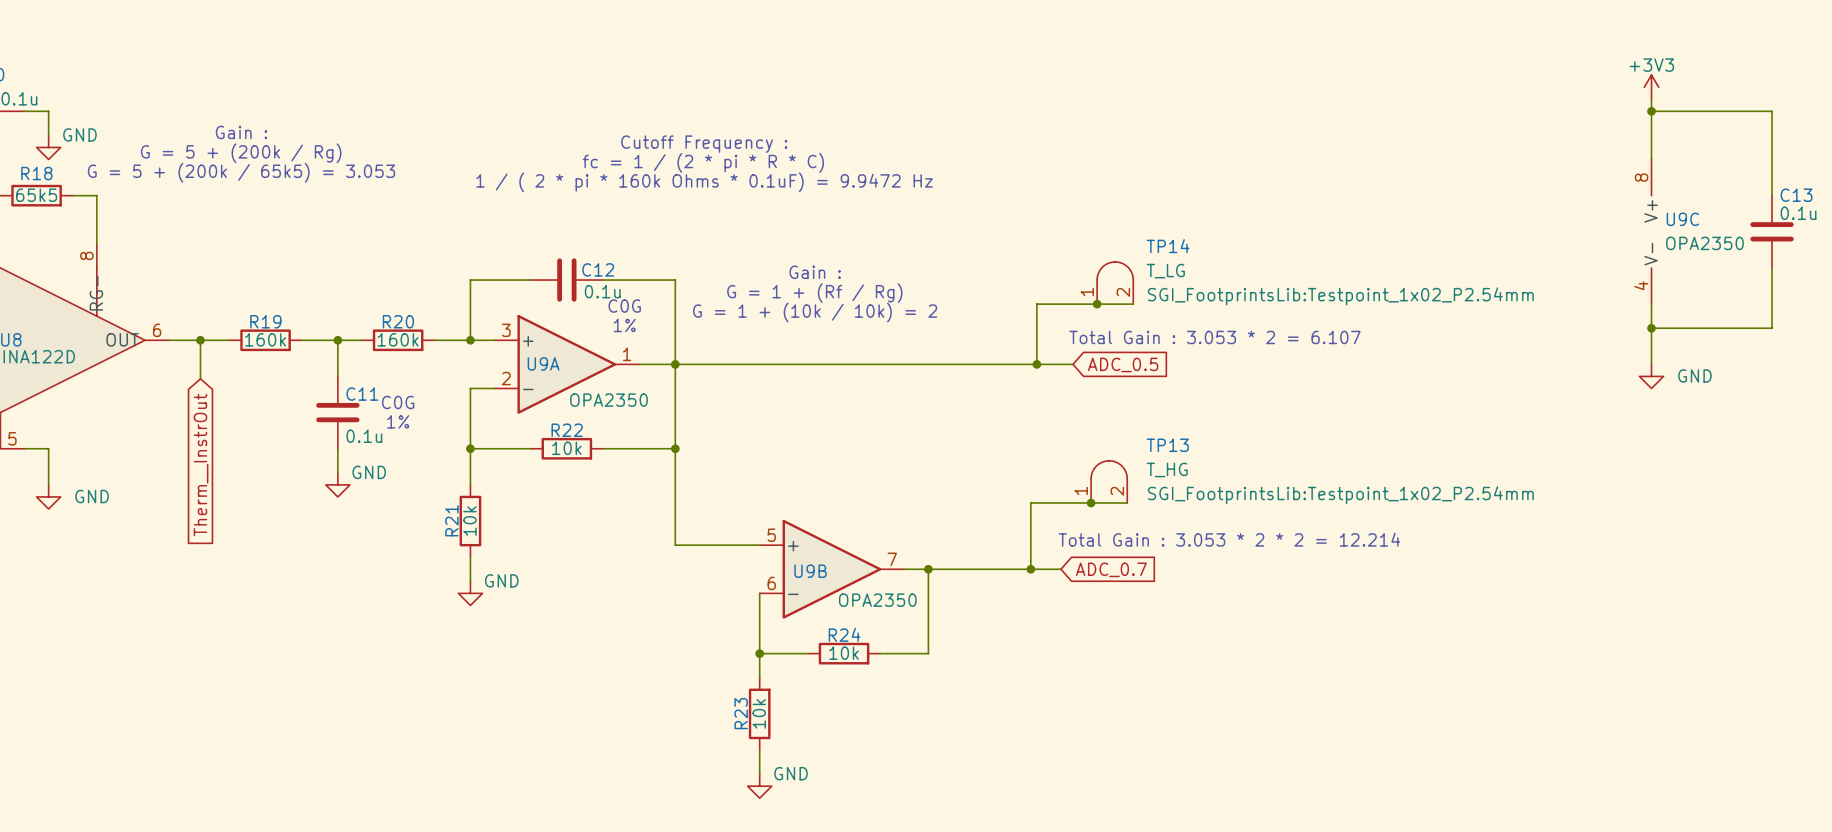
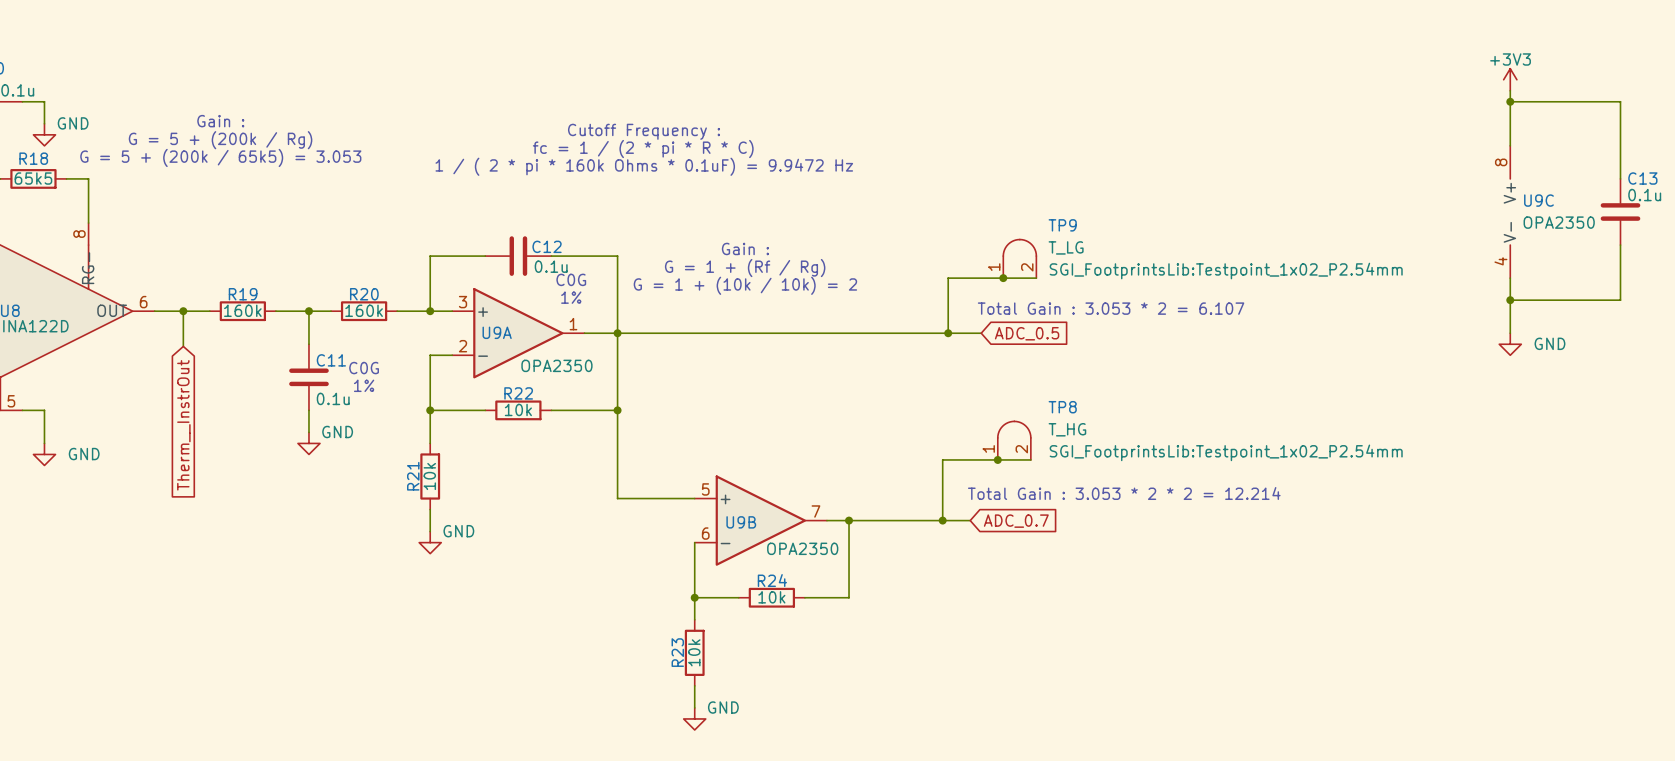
TP14 name: TP14 (1168, 246) -> TP9 (1062, 225)
TP13 name: TP13 (1167, 445) -> TP8 (1062, 407)

